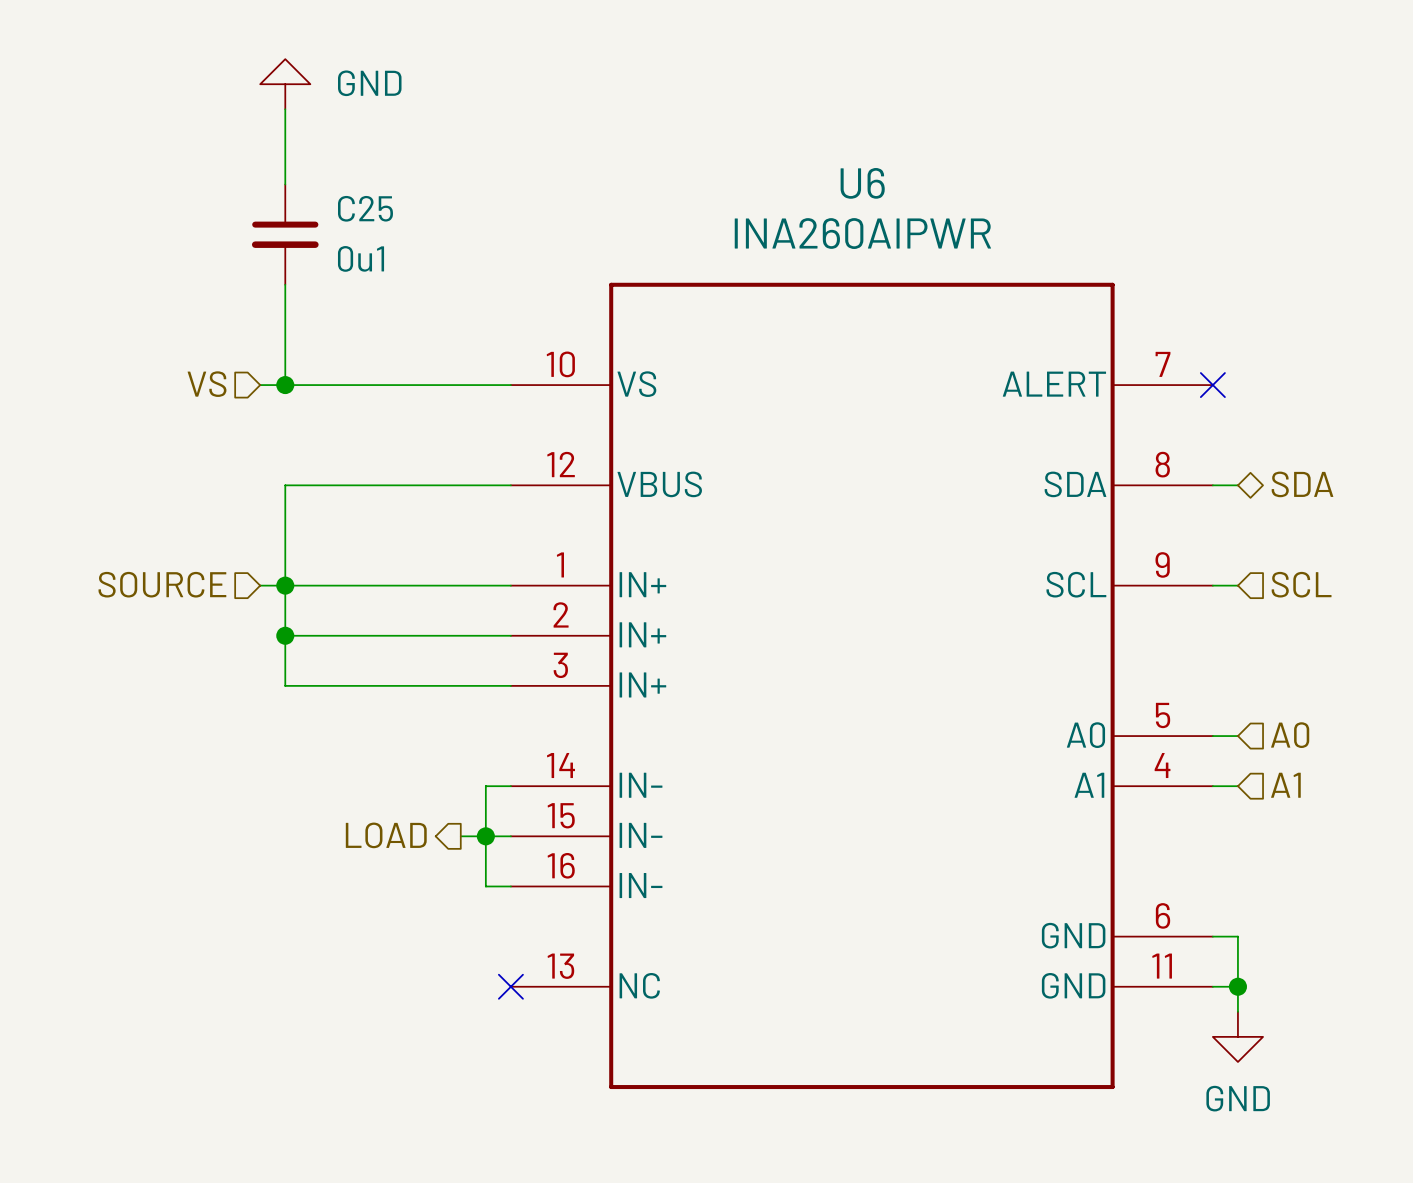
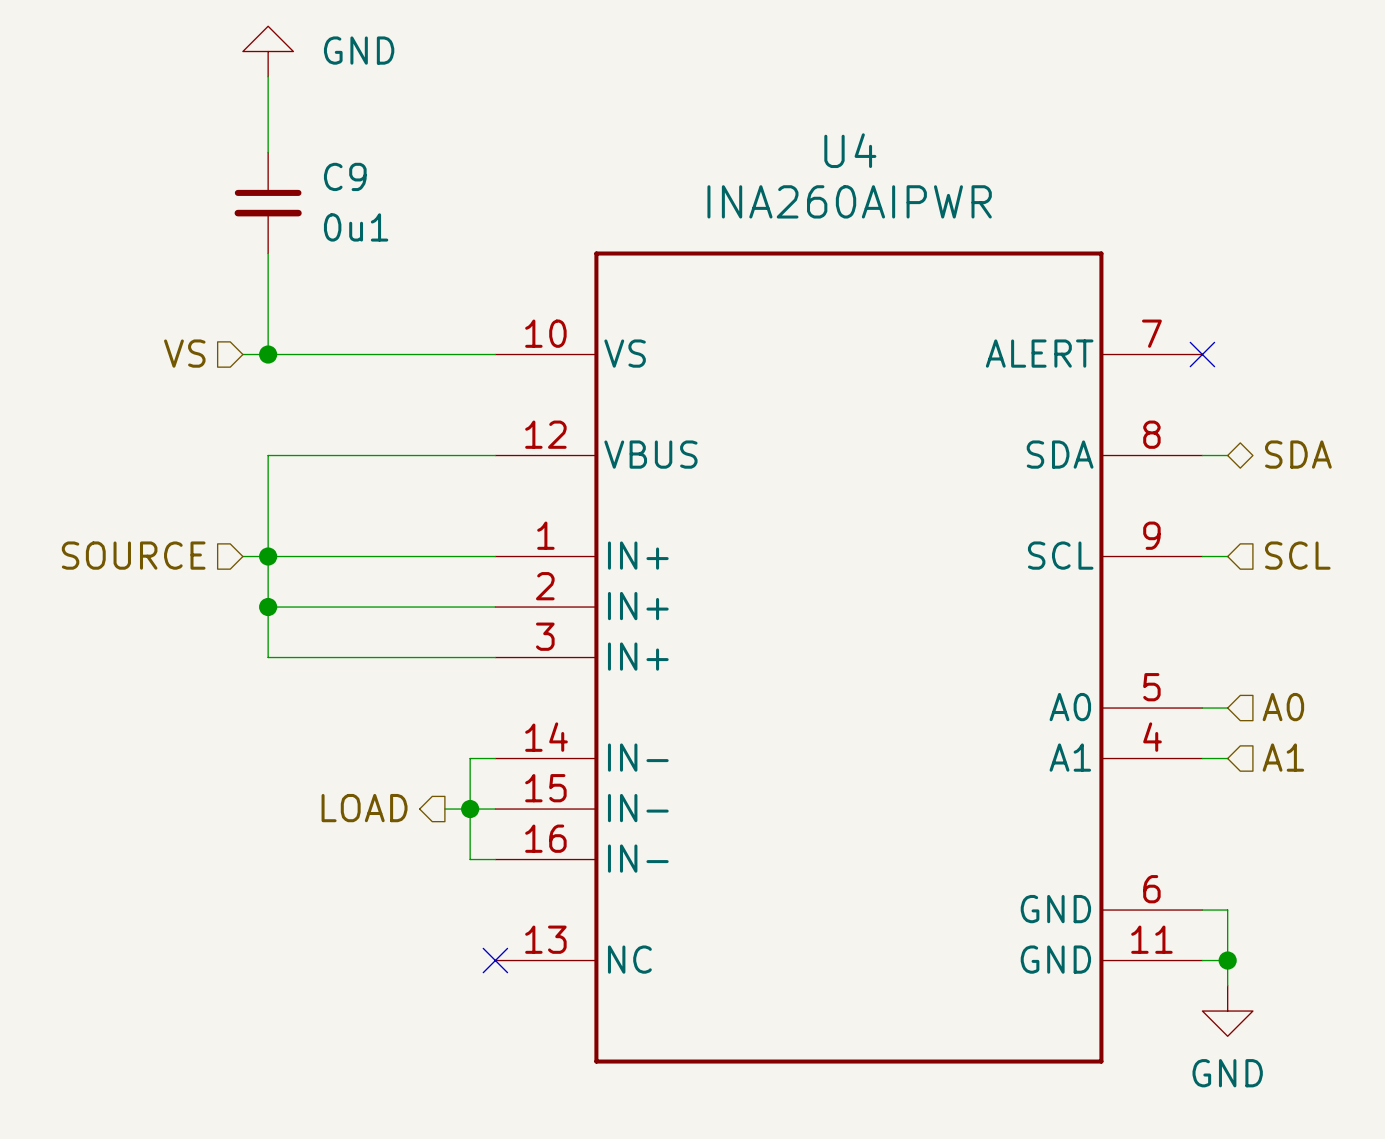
U6 name: U6 (862, 183) -> U4 (850, 150)
C25 name: C25 (365, 208) -> C9 (345, 176)

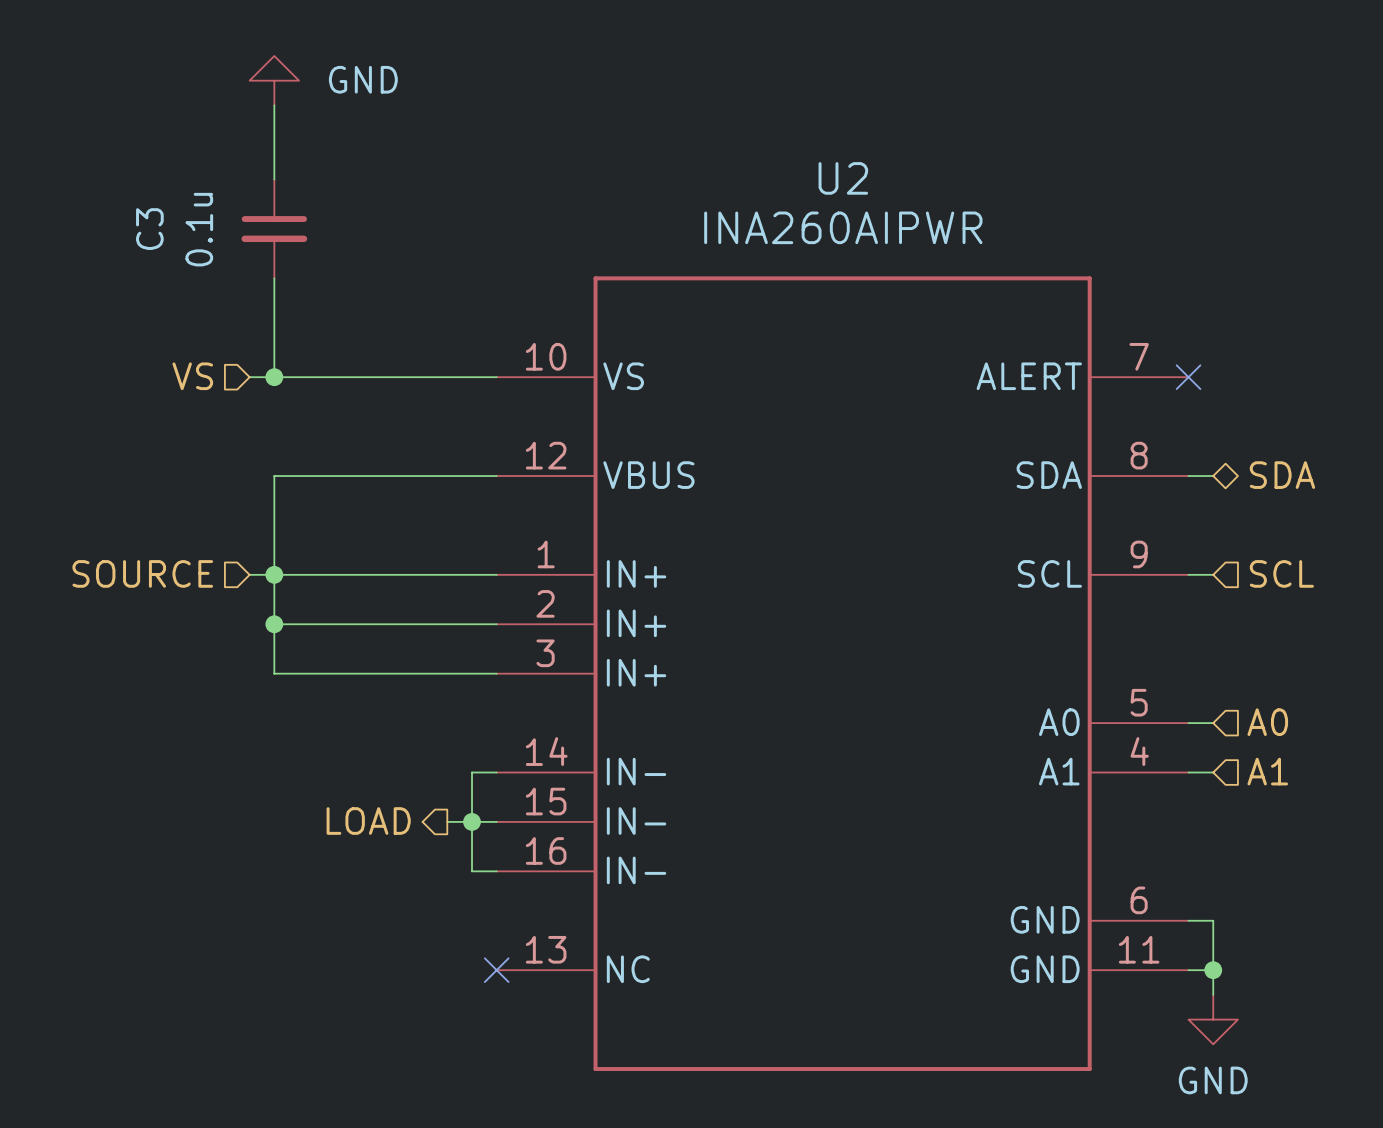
U4 name: U4 (850, 150) -> U2 (843, 178)
C9 name: C9 (345, 176) -> C3 (149, 229)
C9 value: 0u1 (356, 227) -> 0.1u (199, 229)

